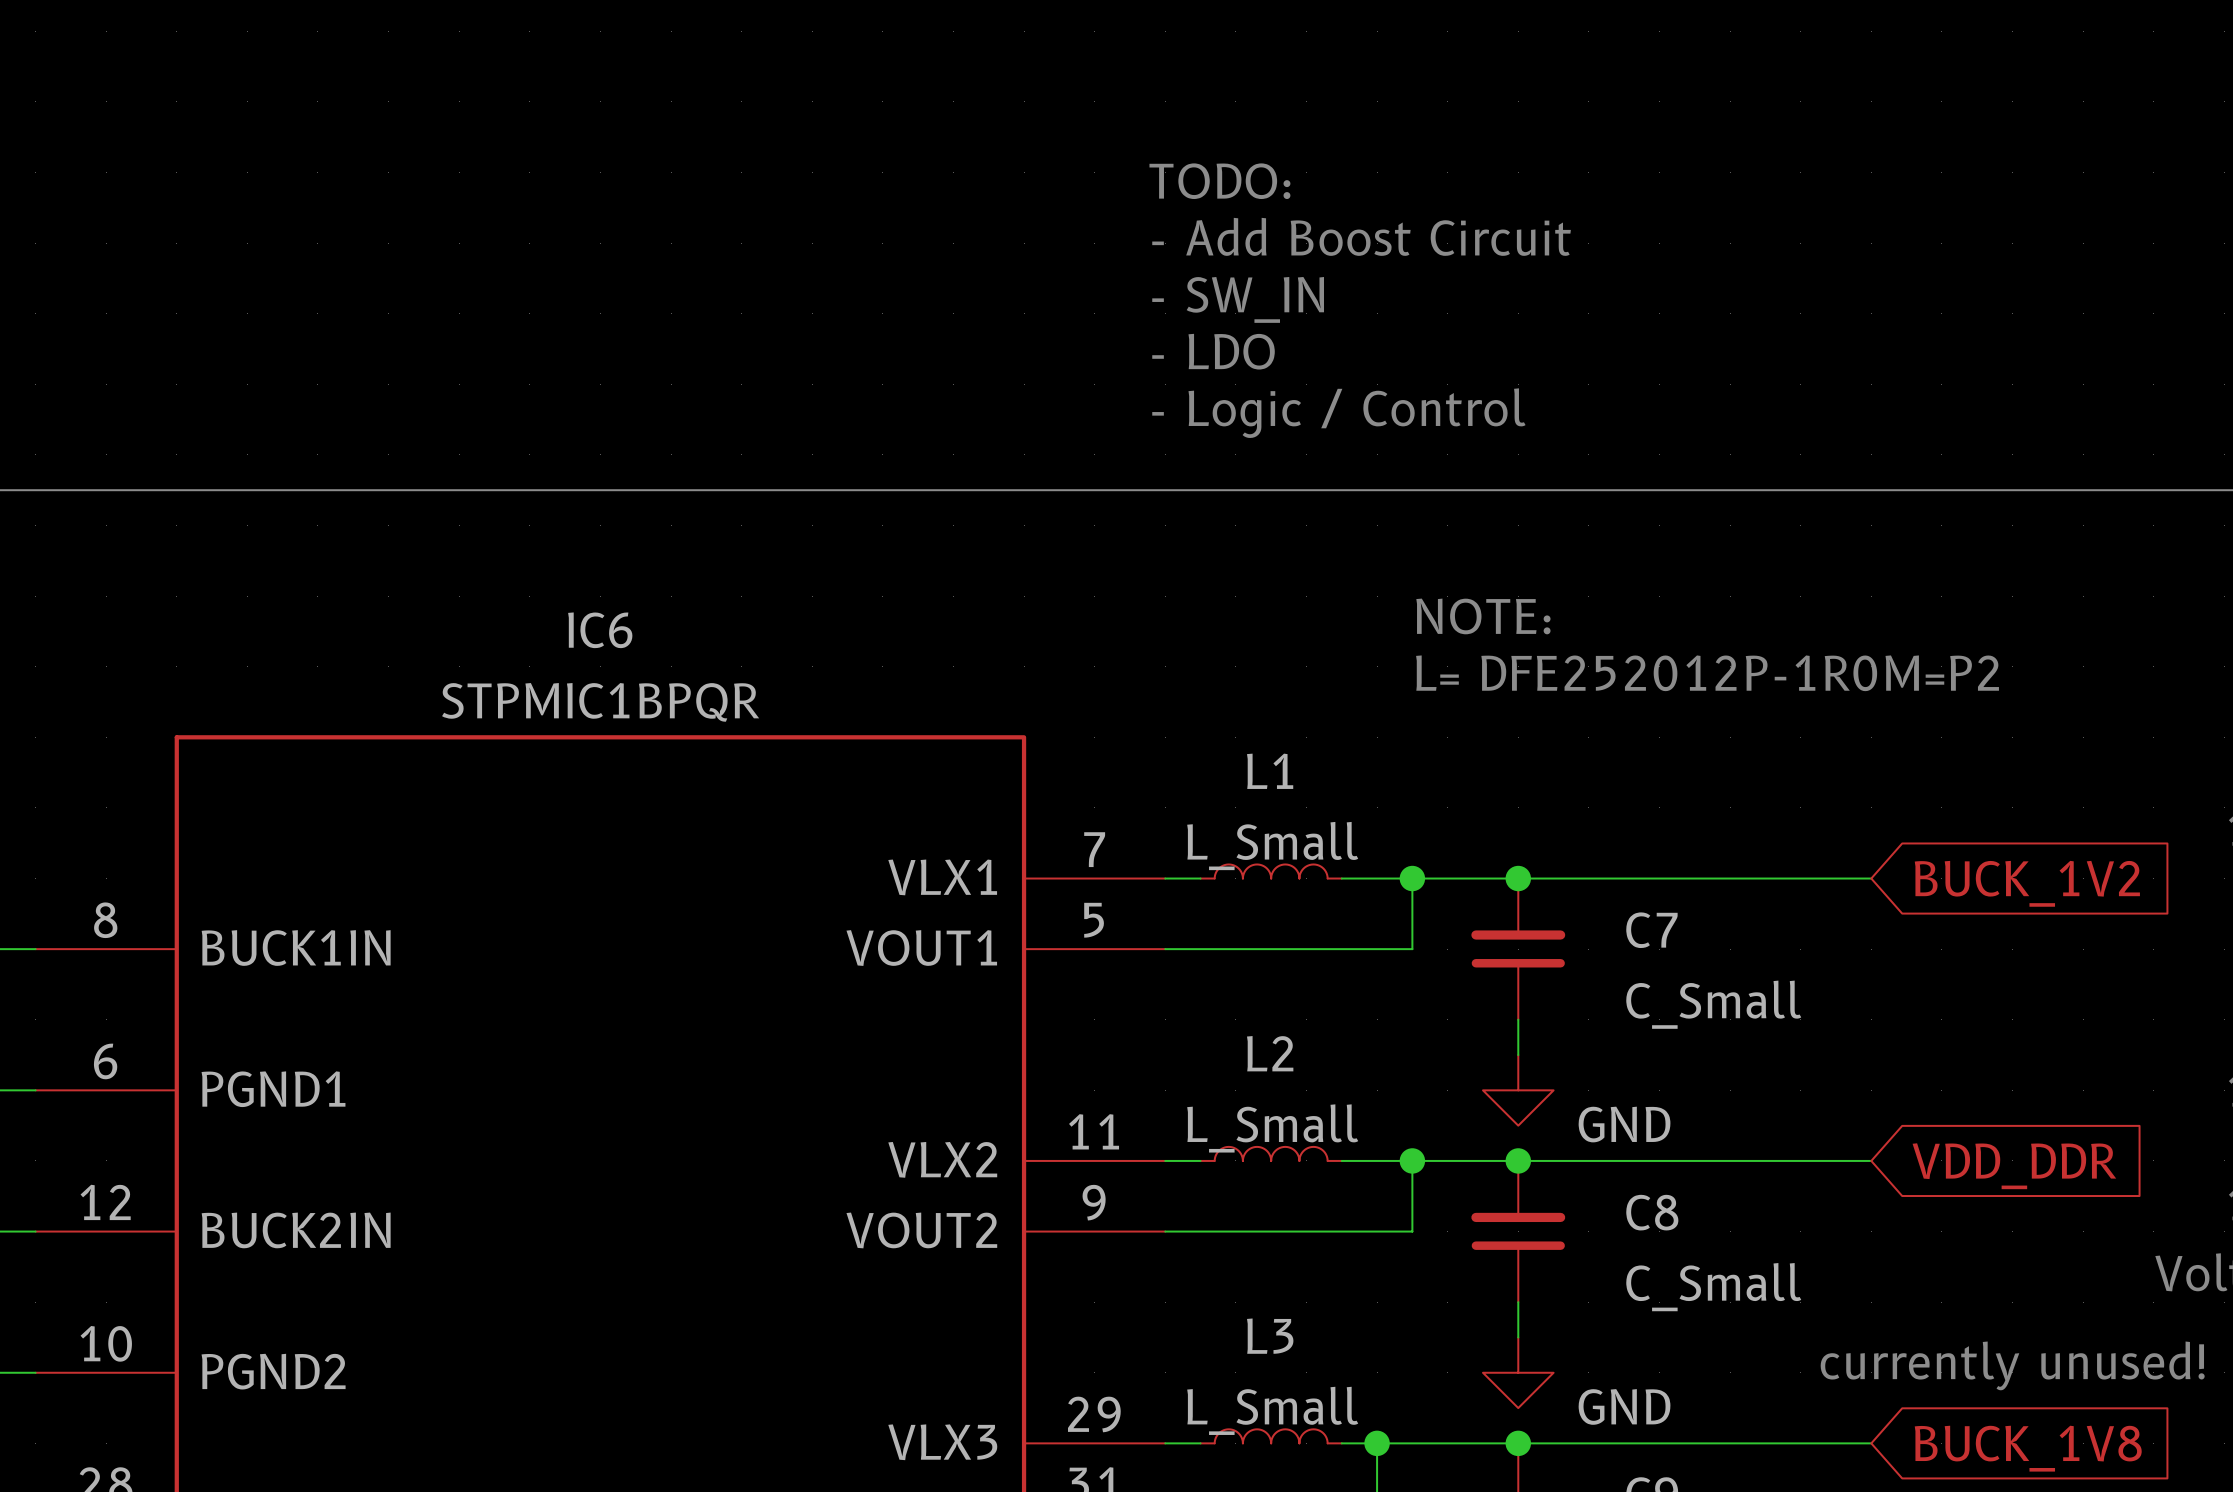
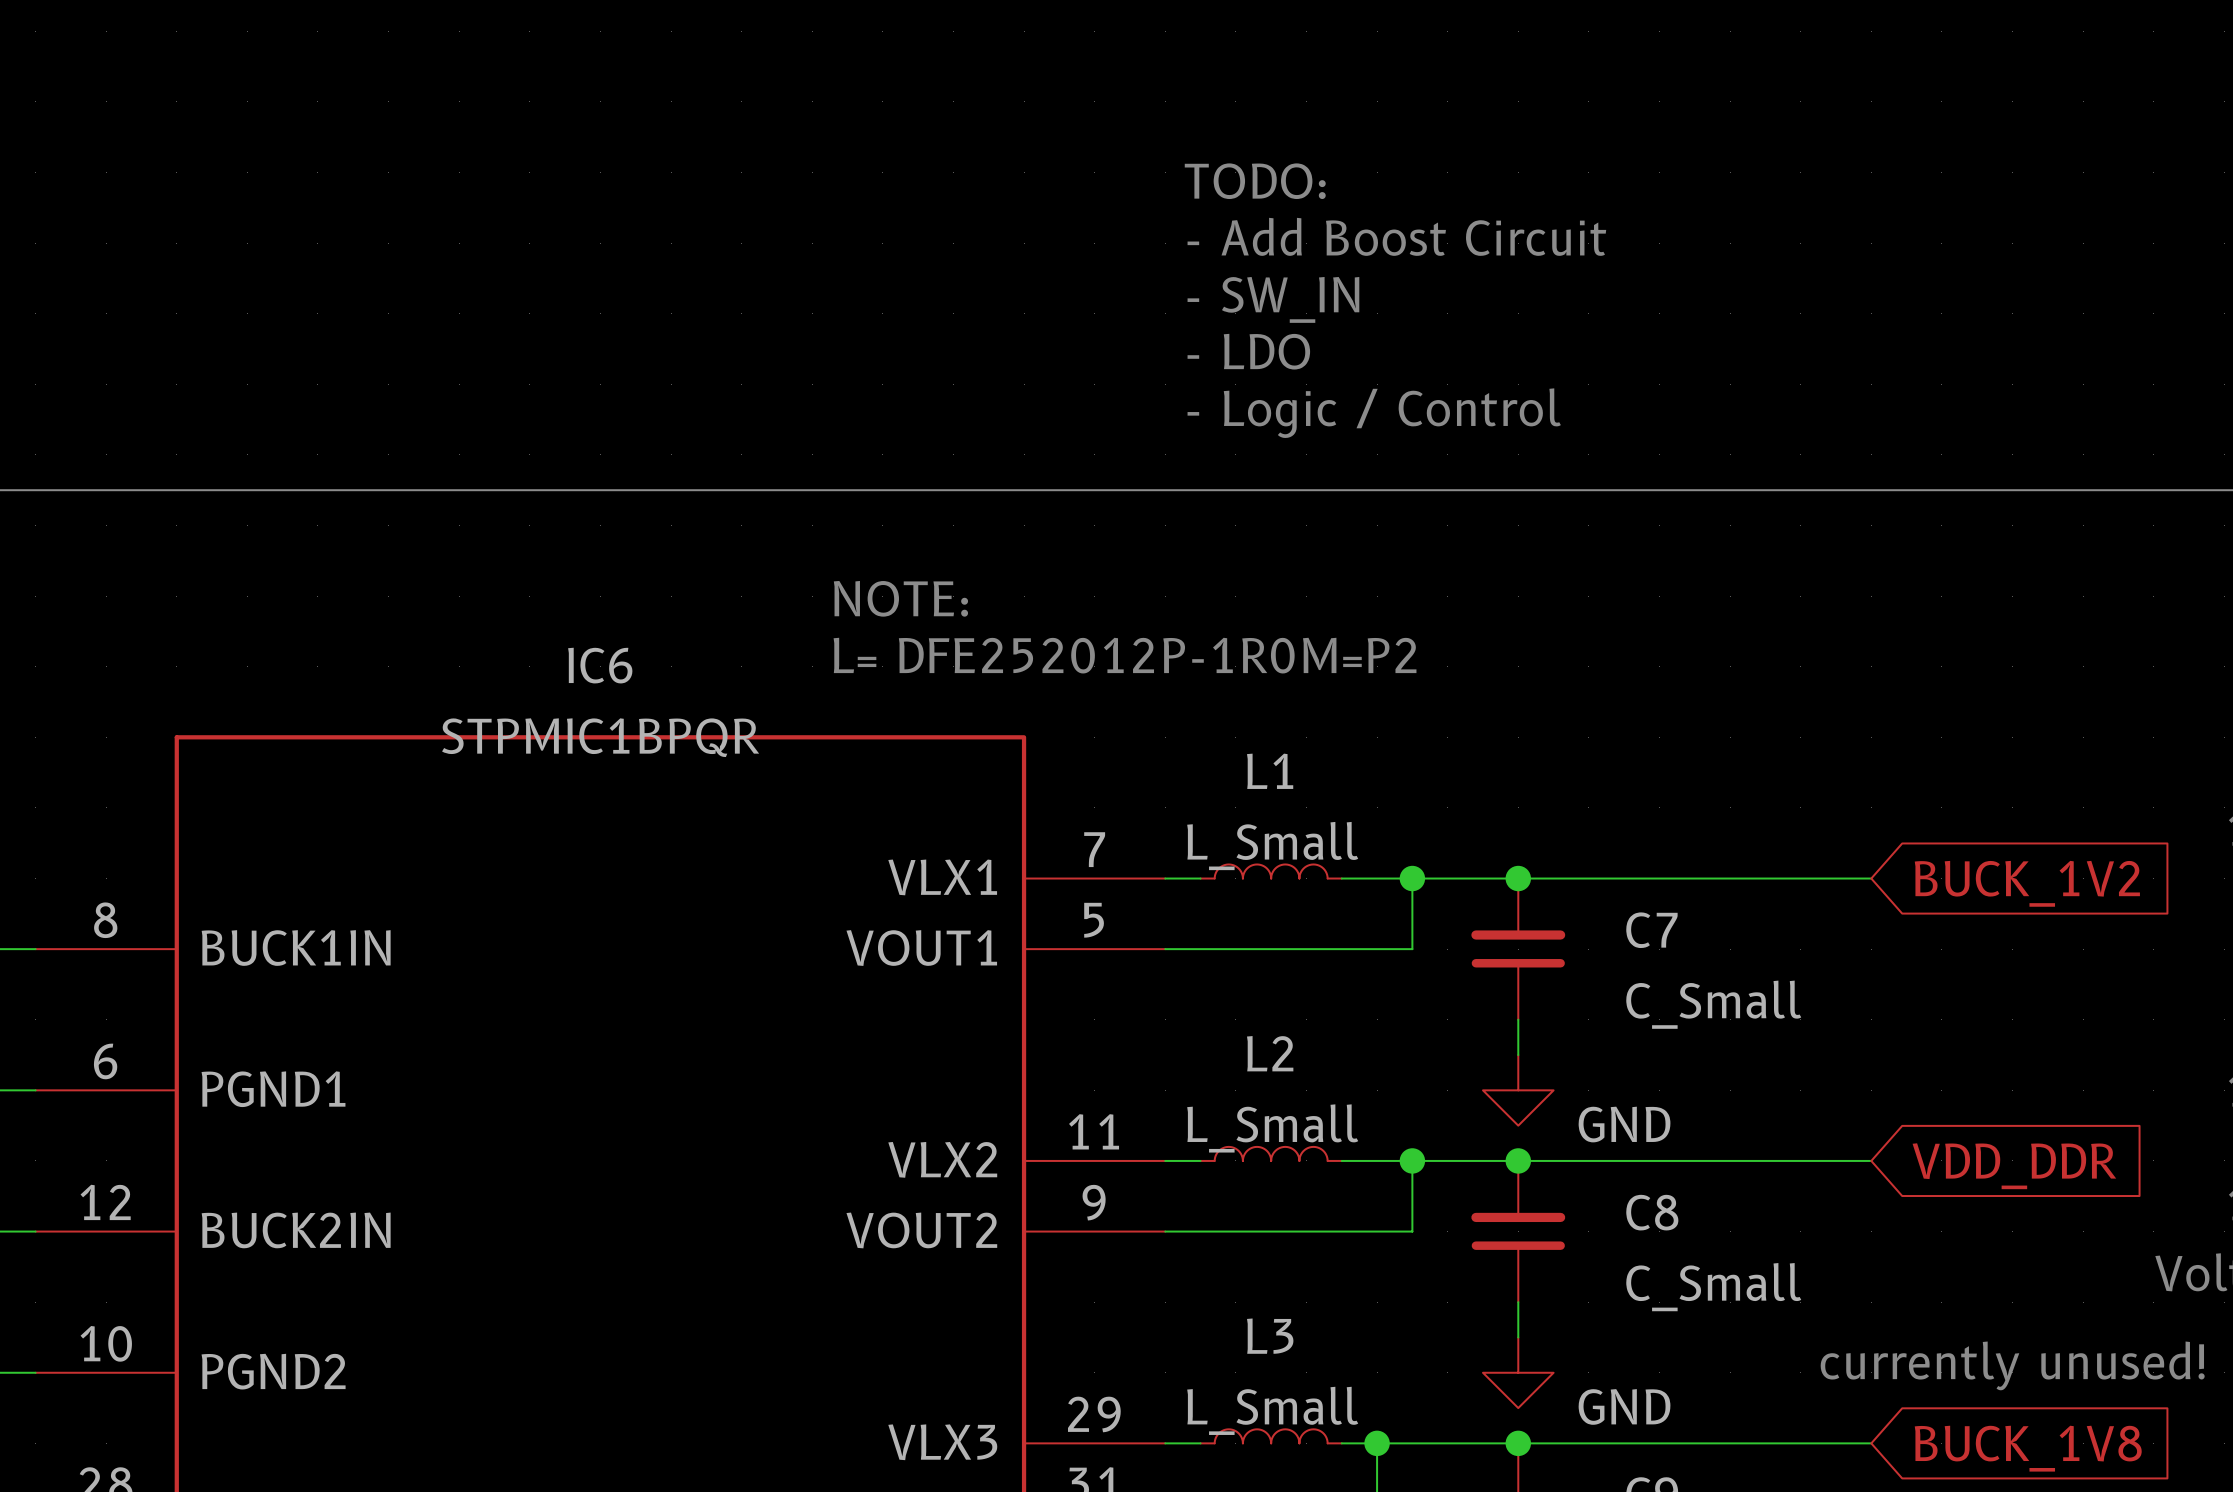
text position: TODO: (1219, 181) -> TODO: (1255, 181)
text position: - Add Boost Circuit (1361, 236) -> - Add Boost Circuit (1396, 236)
text position: - SW_IN (1238, 299) -> - SW_IN (1273, 299)
text position: - LDO (1213, 351) -> - LDO (1248, 351)
text position: - Logic / Control (1338, 413) -> - Logic / Control (1374, 413)
text position: NOTE: (1483, 616) -> NOTE: (900, 598)
IC6 name position: IC6 (600, 630) -> IC6 (600, 665)
text position: L= DFE252012P-1R0M=P2 (1707, 673) -> L= DFE252012P-1R0M=P2 (1125, 655)
IC6 value position: STPMIC1BPQR (600, 702) -> STPMIC1BPQR (600, 737)

